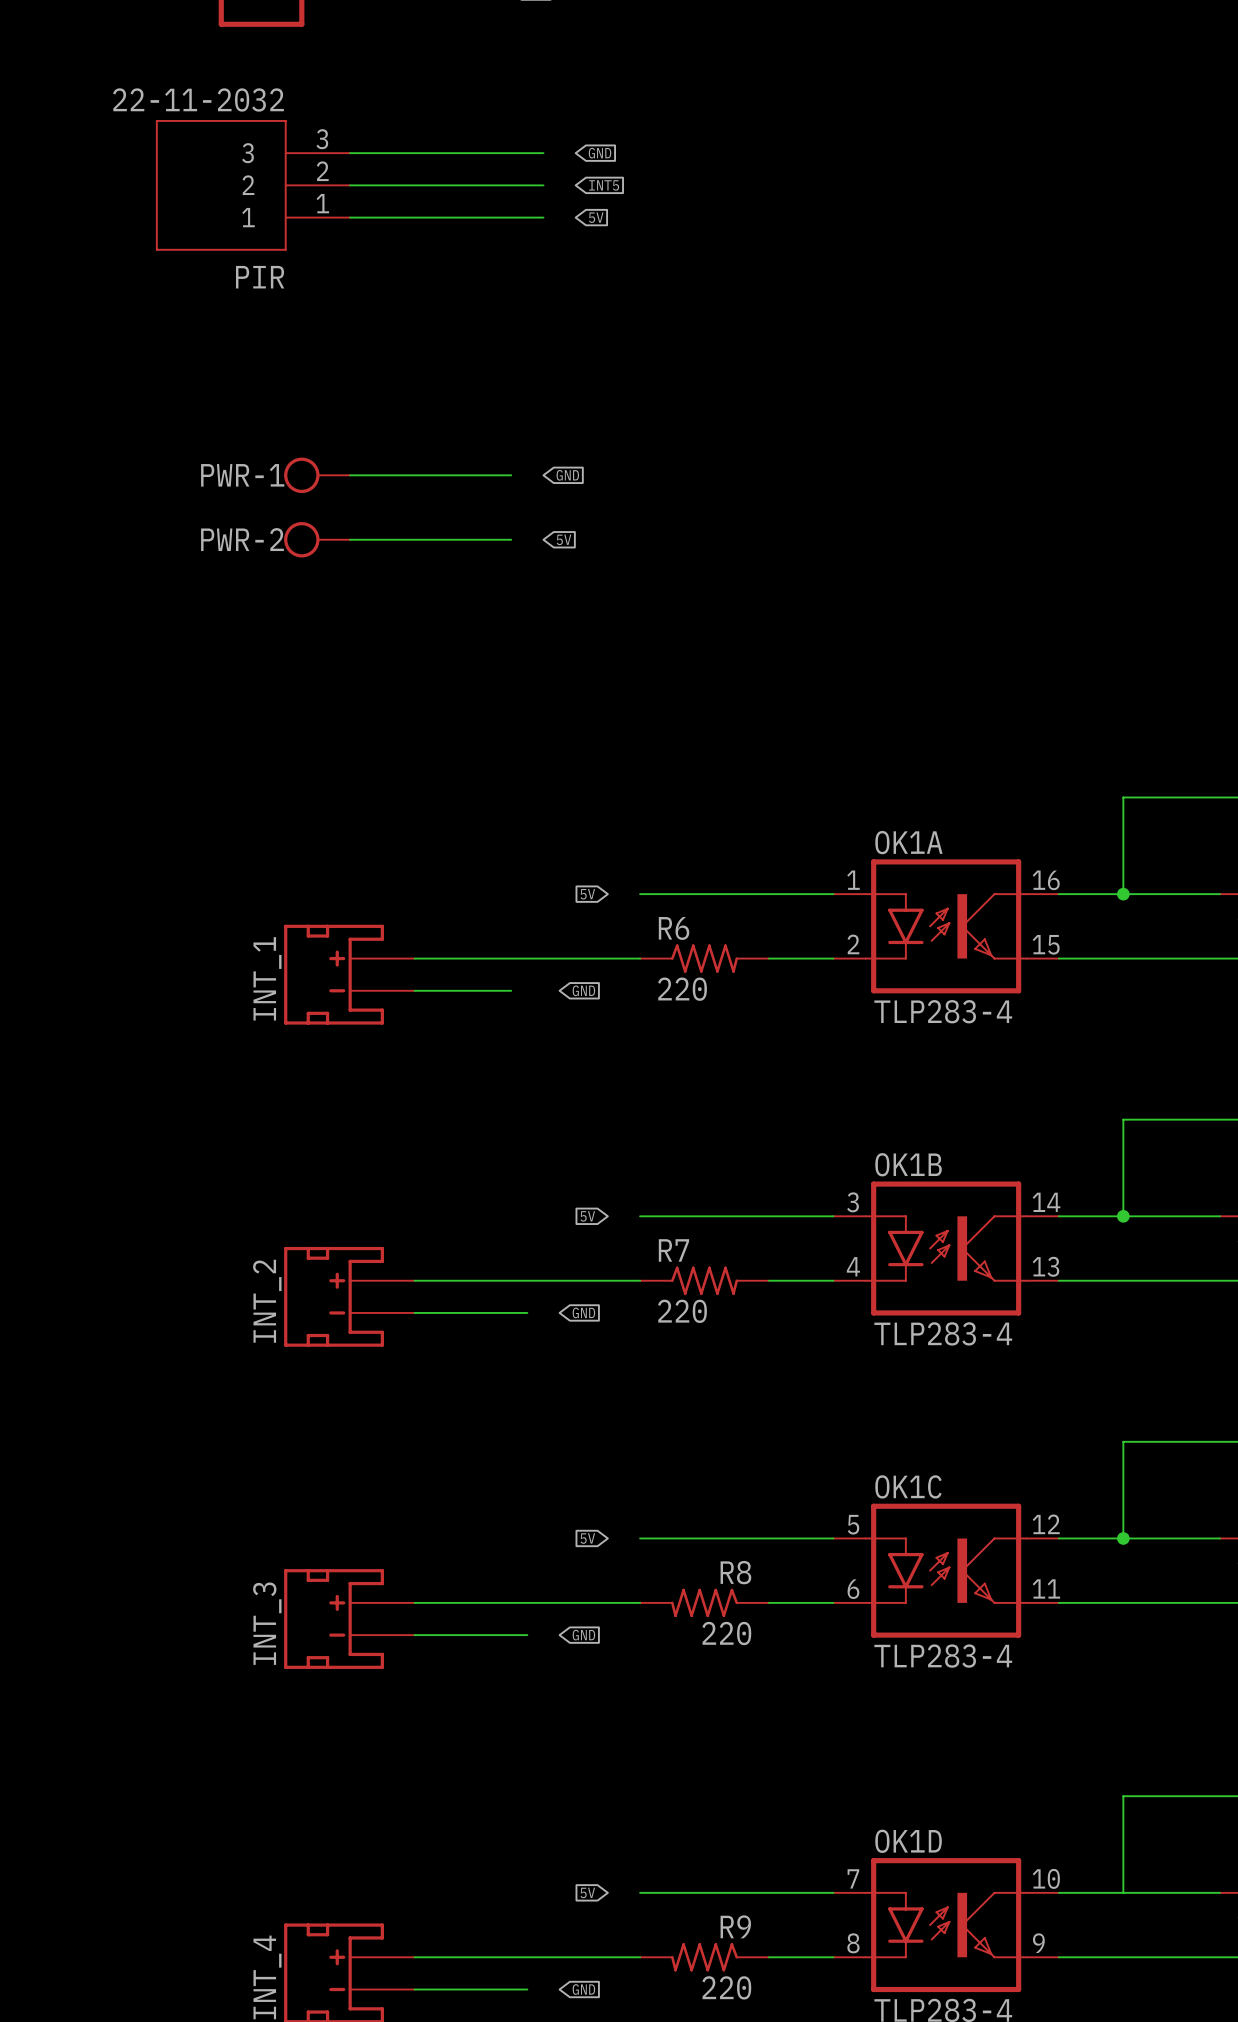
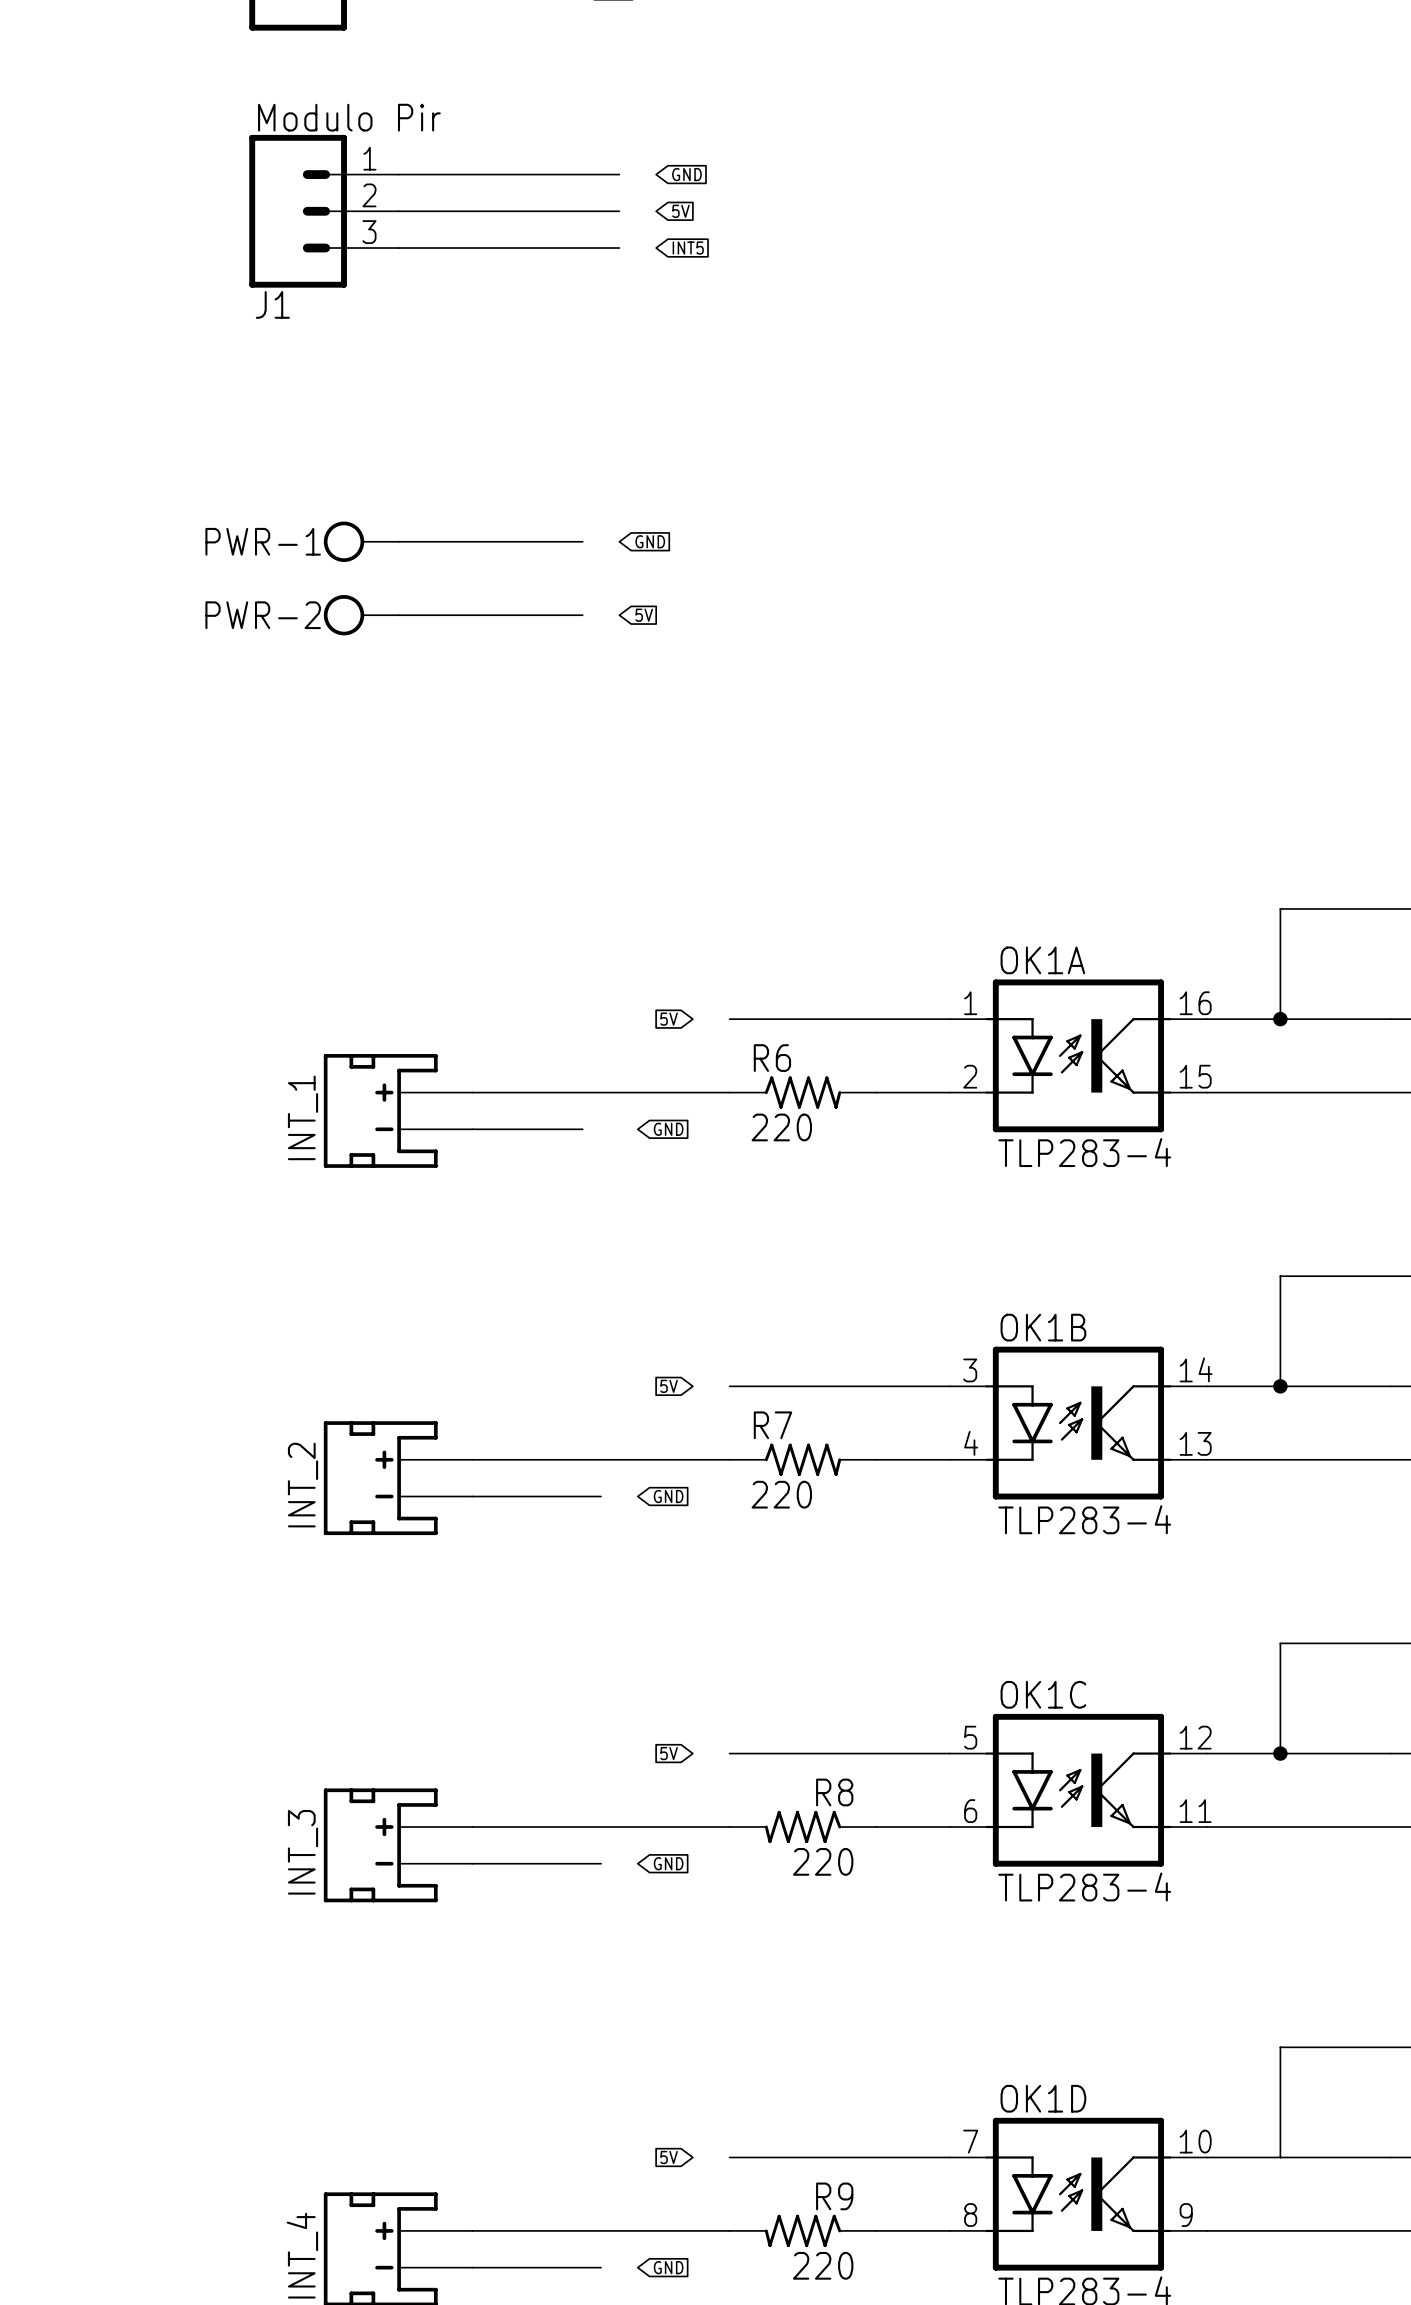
PIR: 22-11-2032 (253, 185) -> none
J1: none -> Modulo Pir (324, 211)
global label: INT5 (604, 185) -> 5V (680, 211)
global label: 5V (596, 217) -> INT5 (688, 248)

